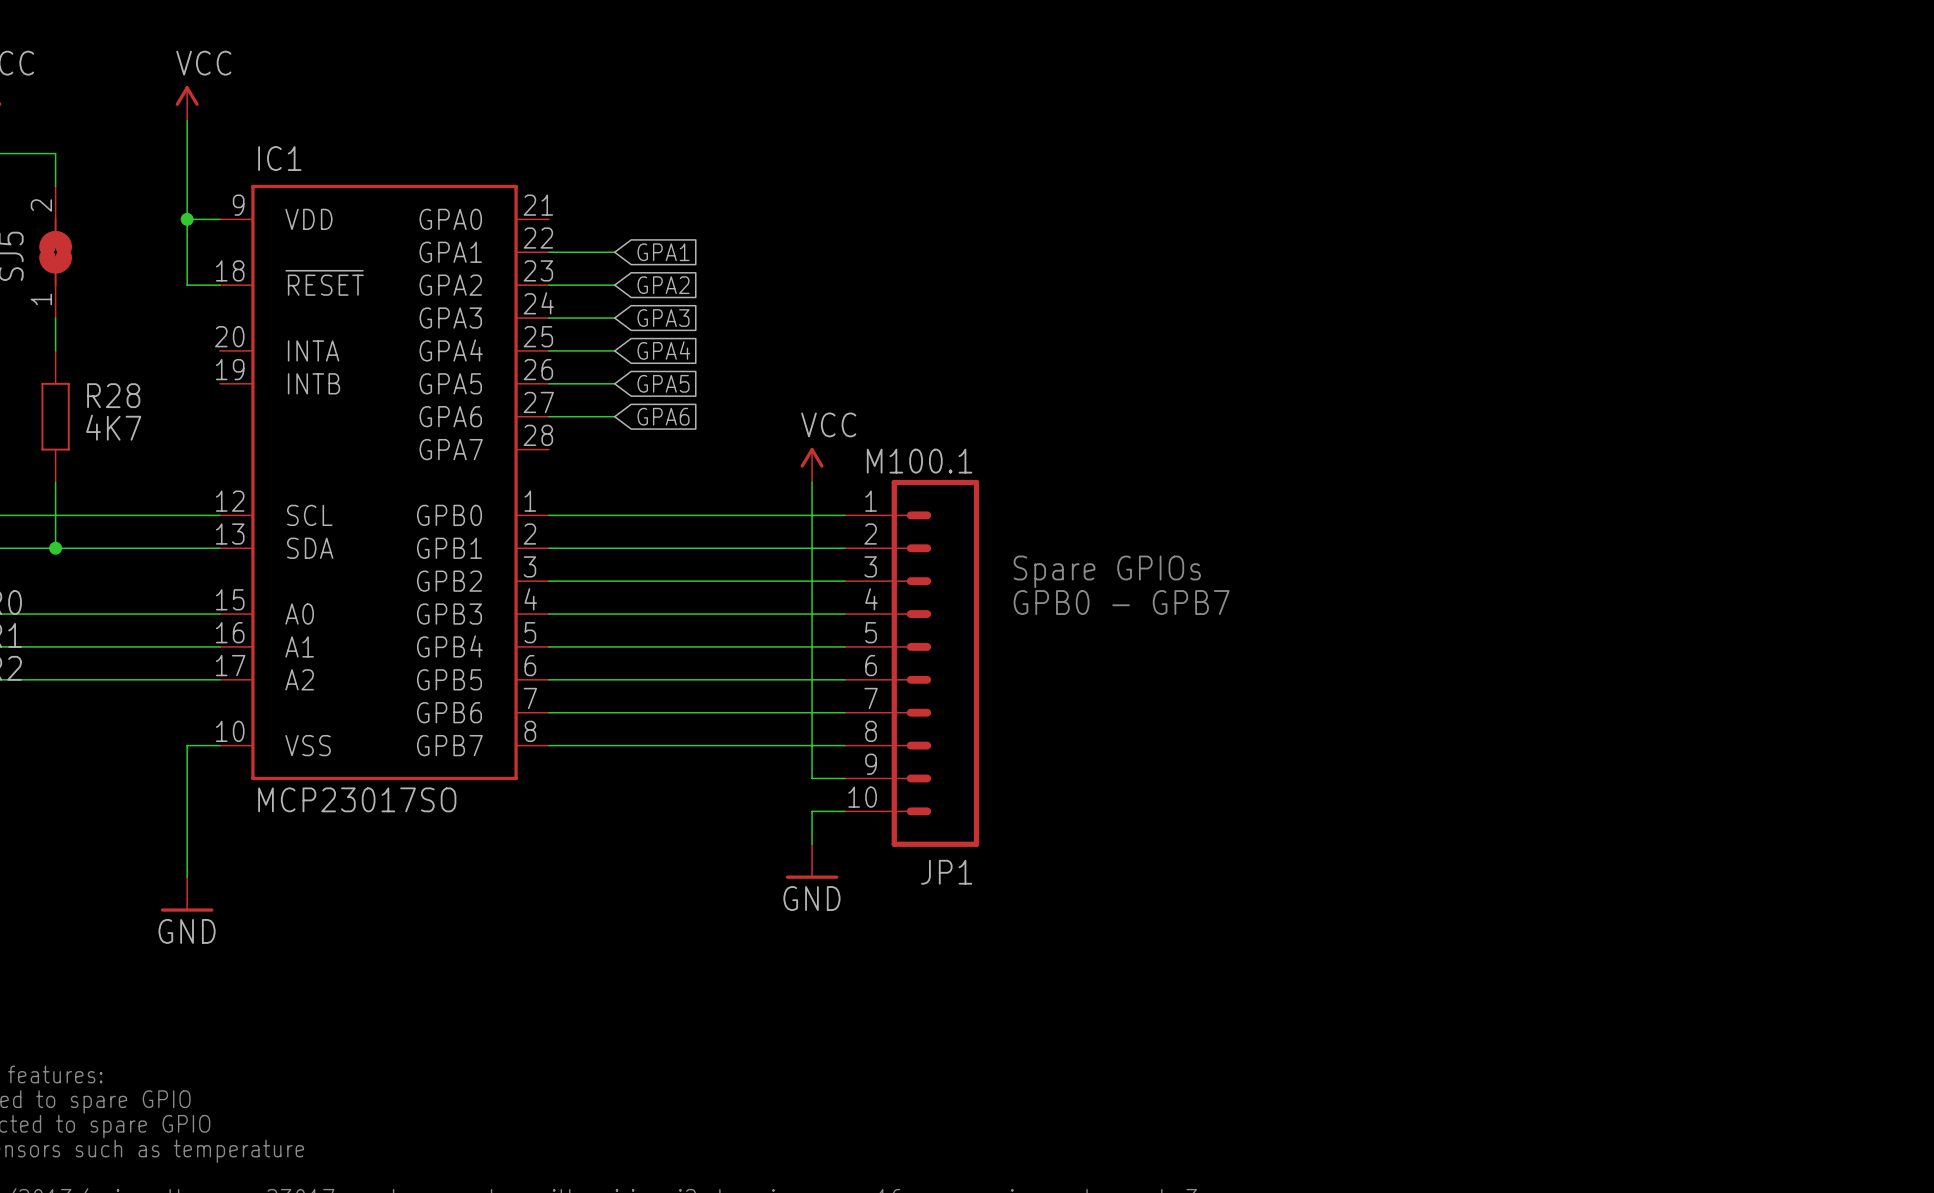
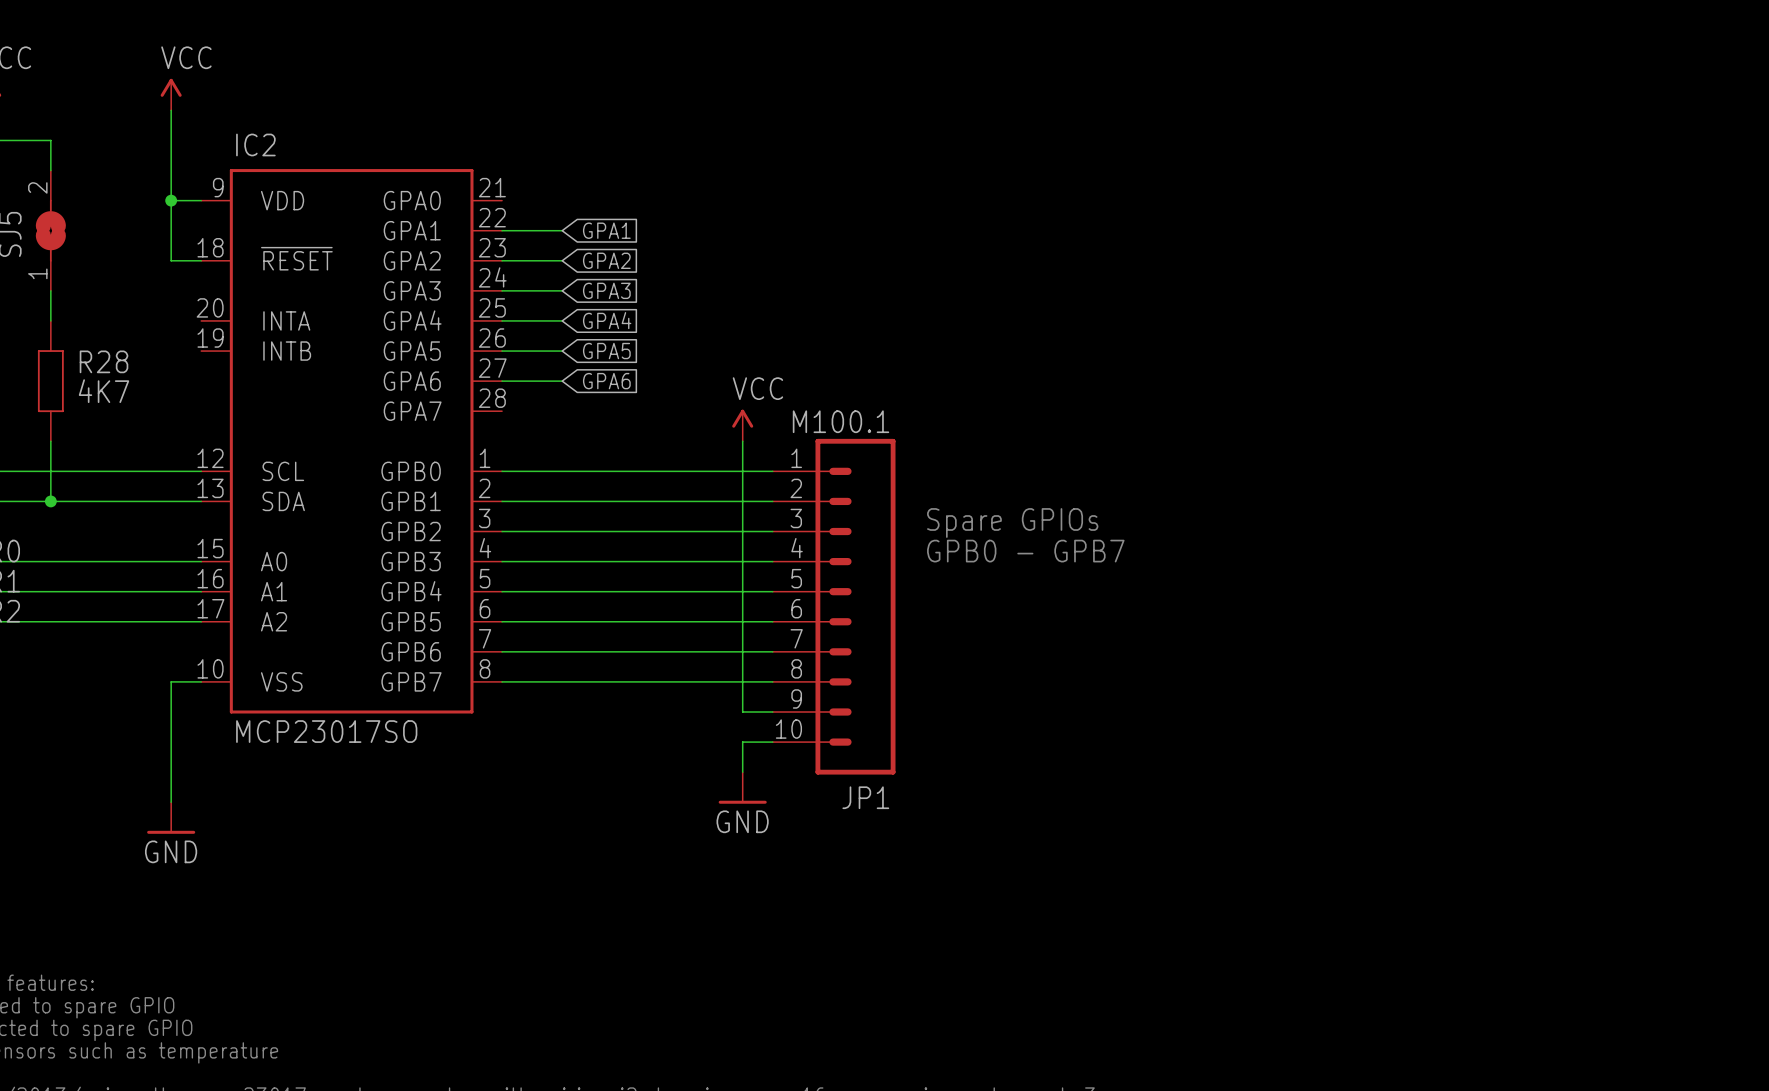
IC1 name: IC1 (279, 158) -> IC2 (255, 144)

